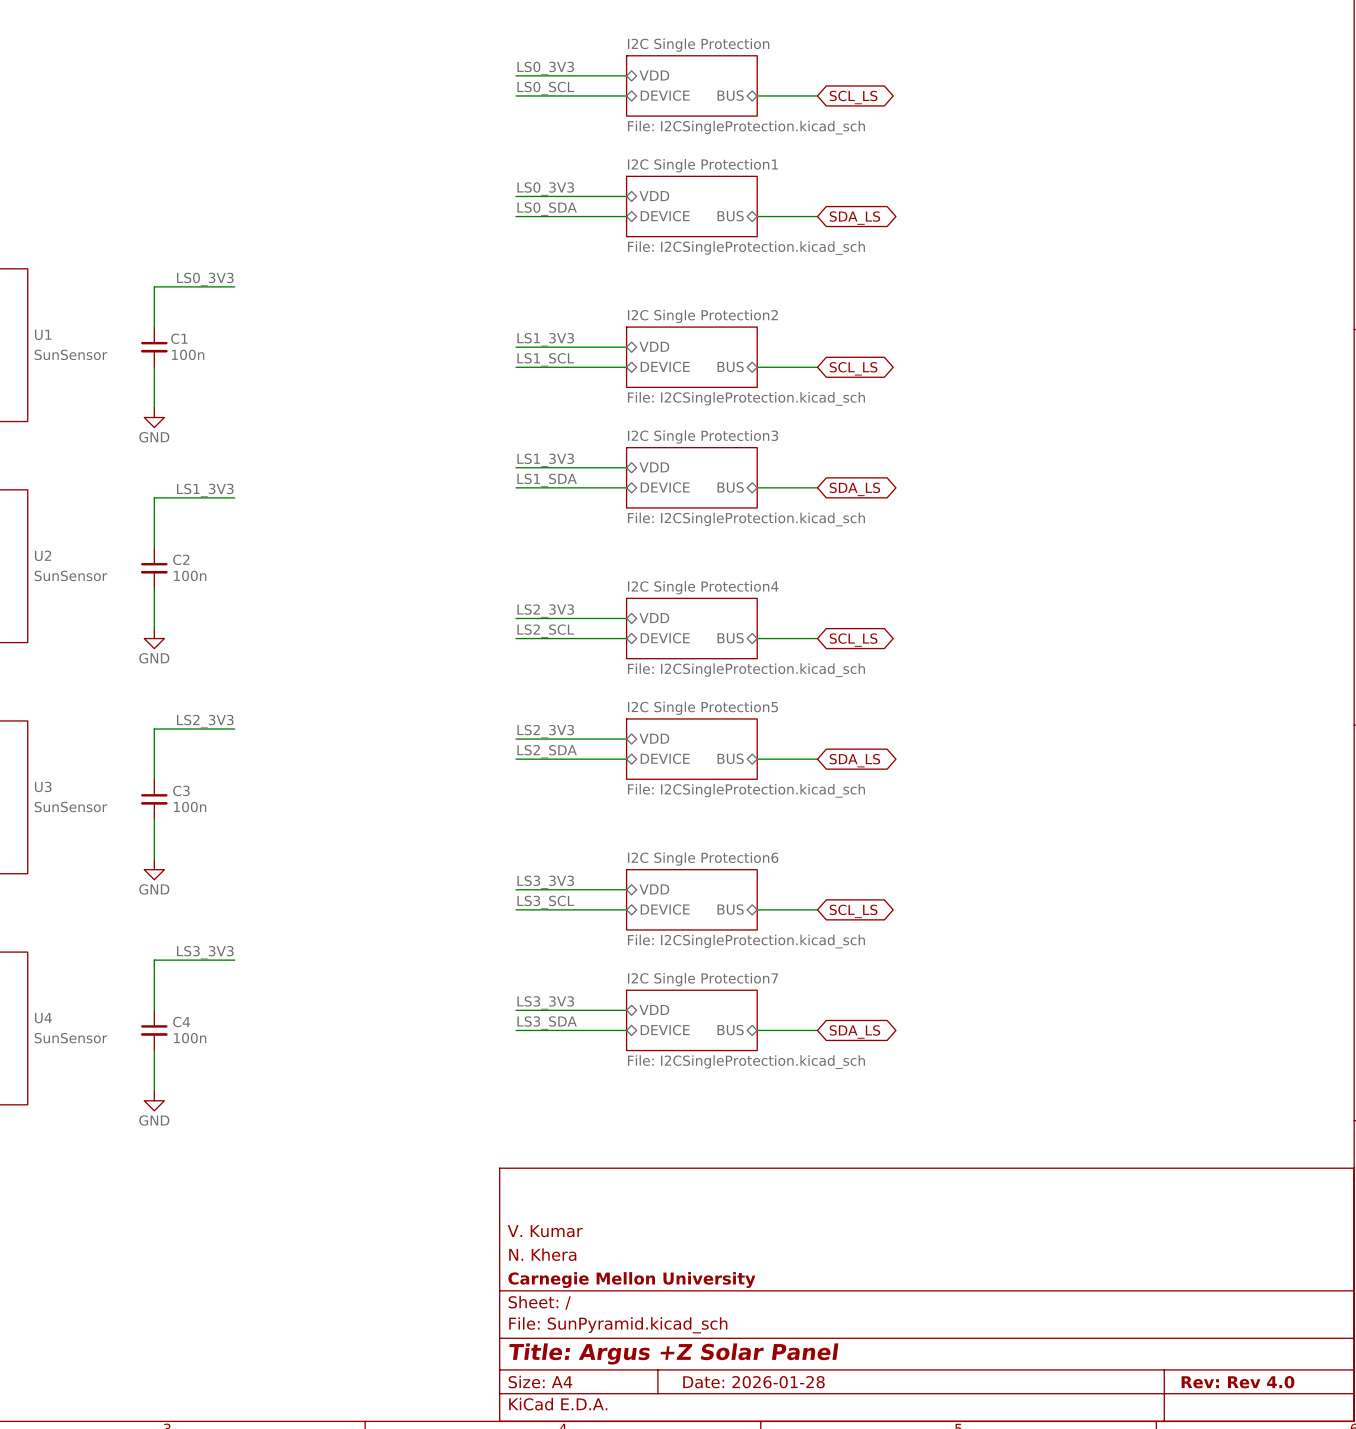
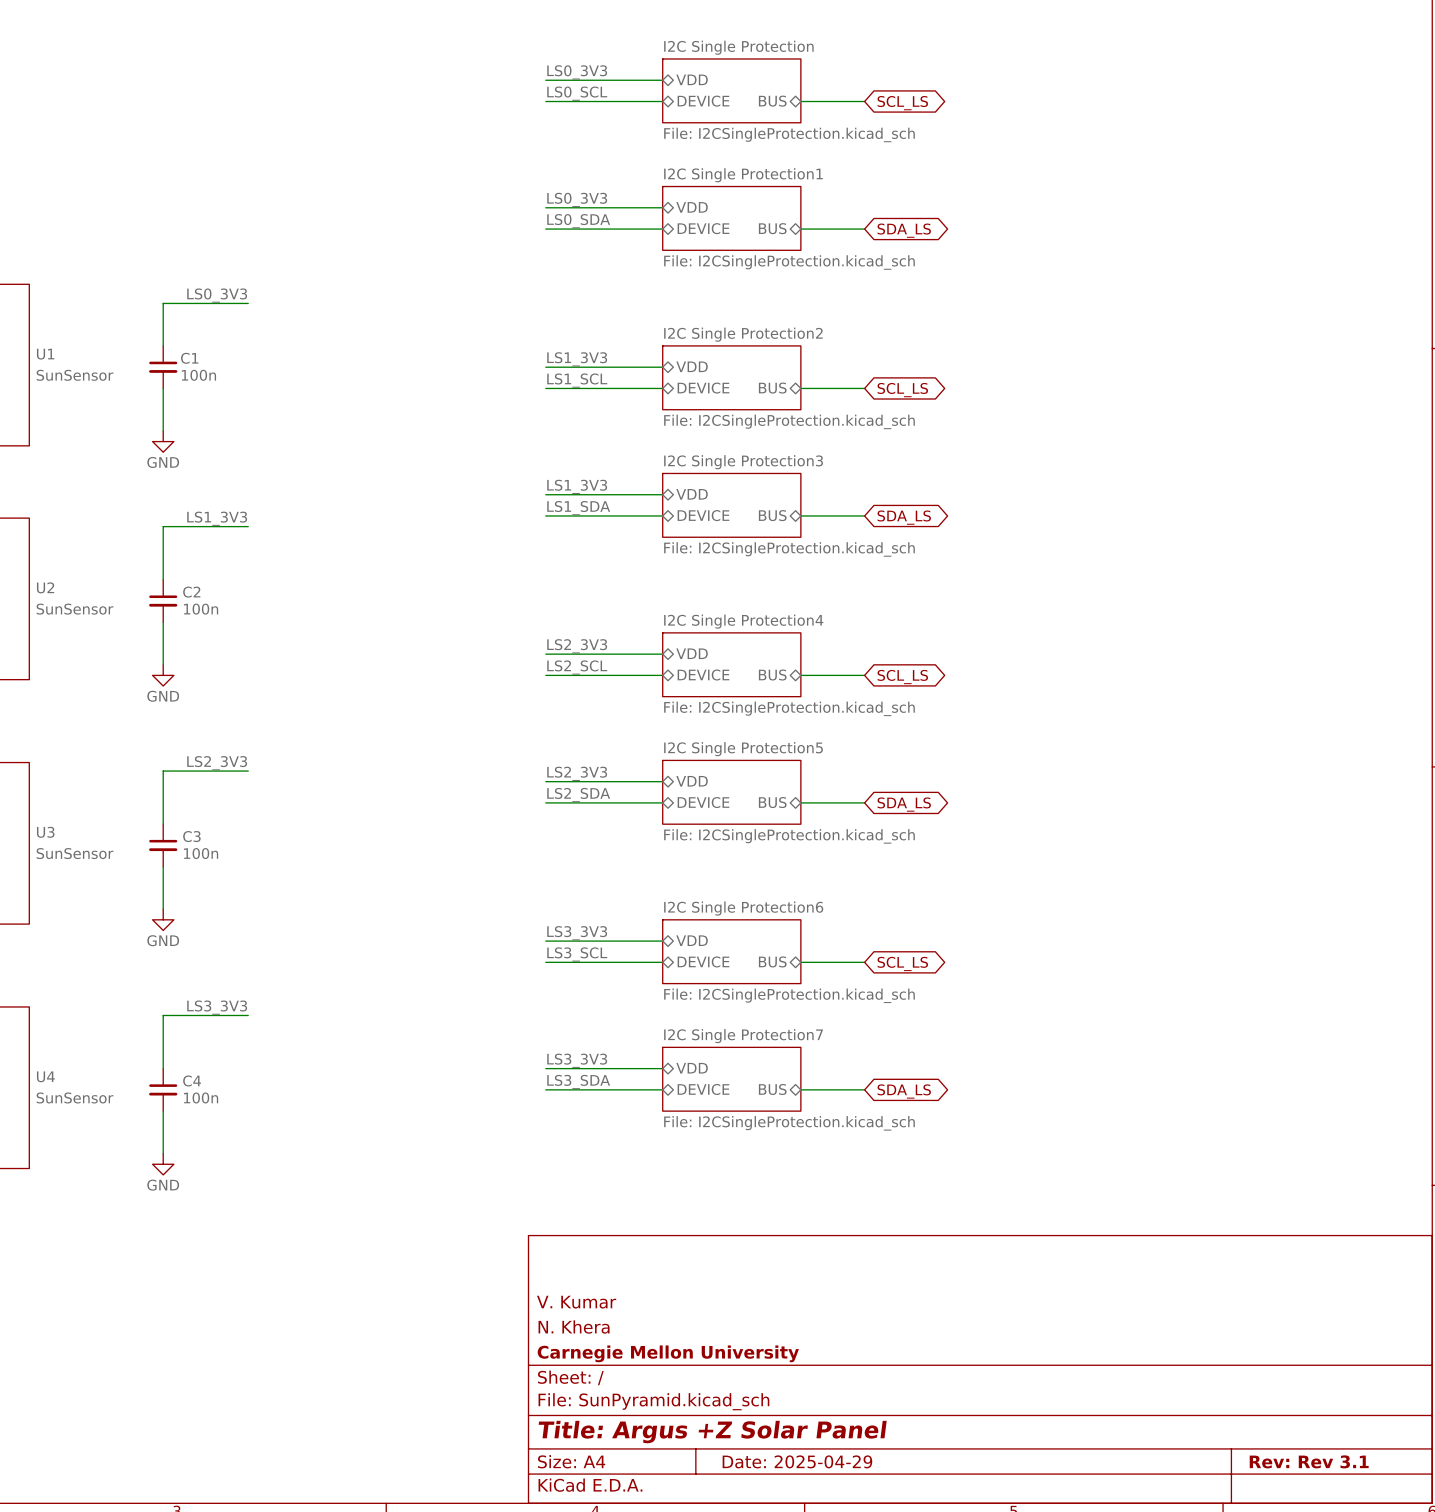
title block: Date: 2026-01-28 (753, 1382) -> Date: 2025-04-29 (797, 1461)
title block: Rev: Rev 4.0 (1237, 1382) -> Rev: Rev 3.1 (1309, 1461)

